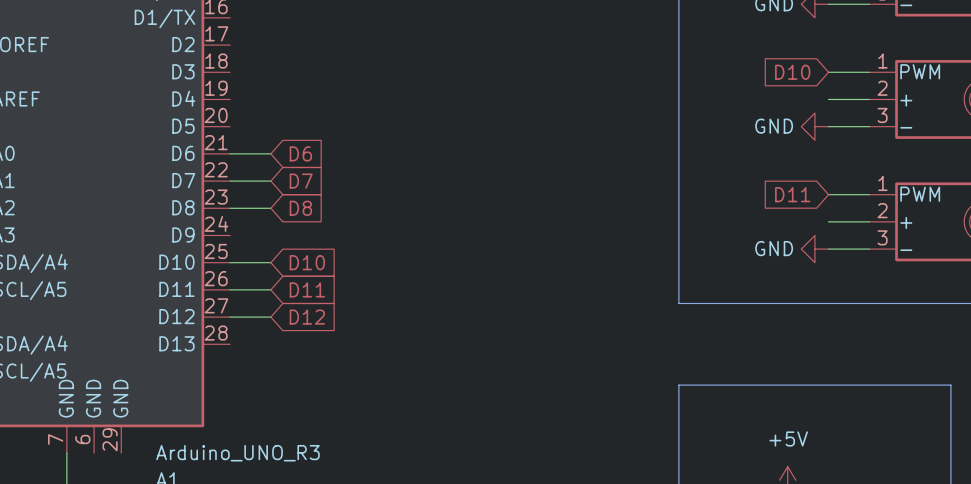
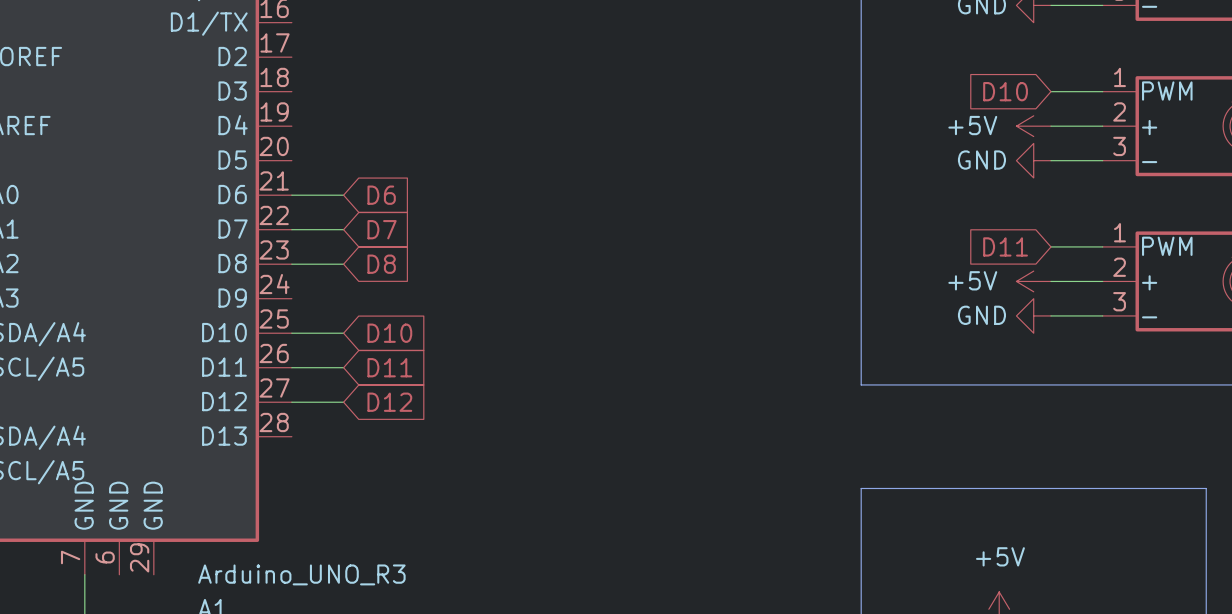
power symbol: none -> +5V (1033, 126)
power symbol: none -> +5V (1033, 281)

